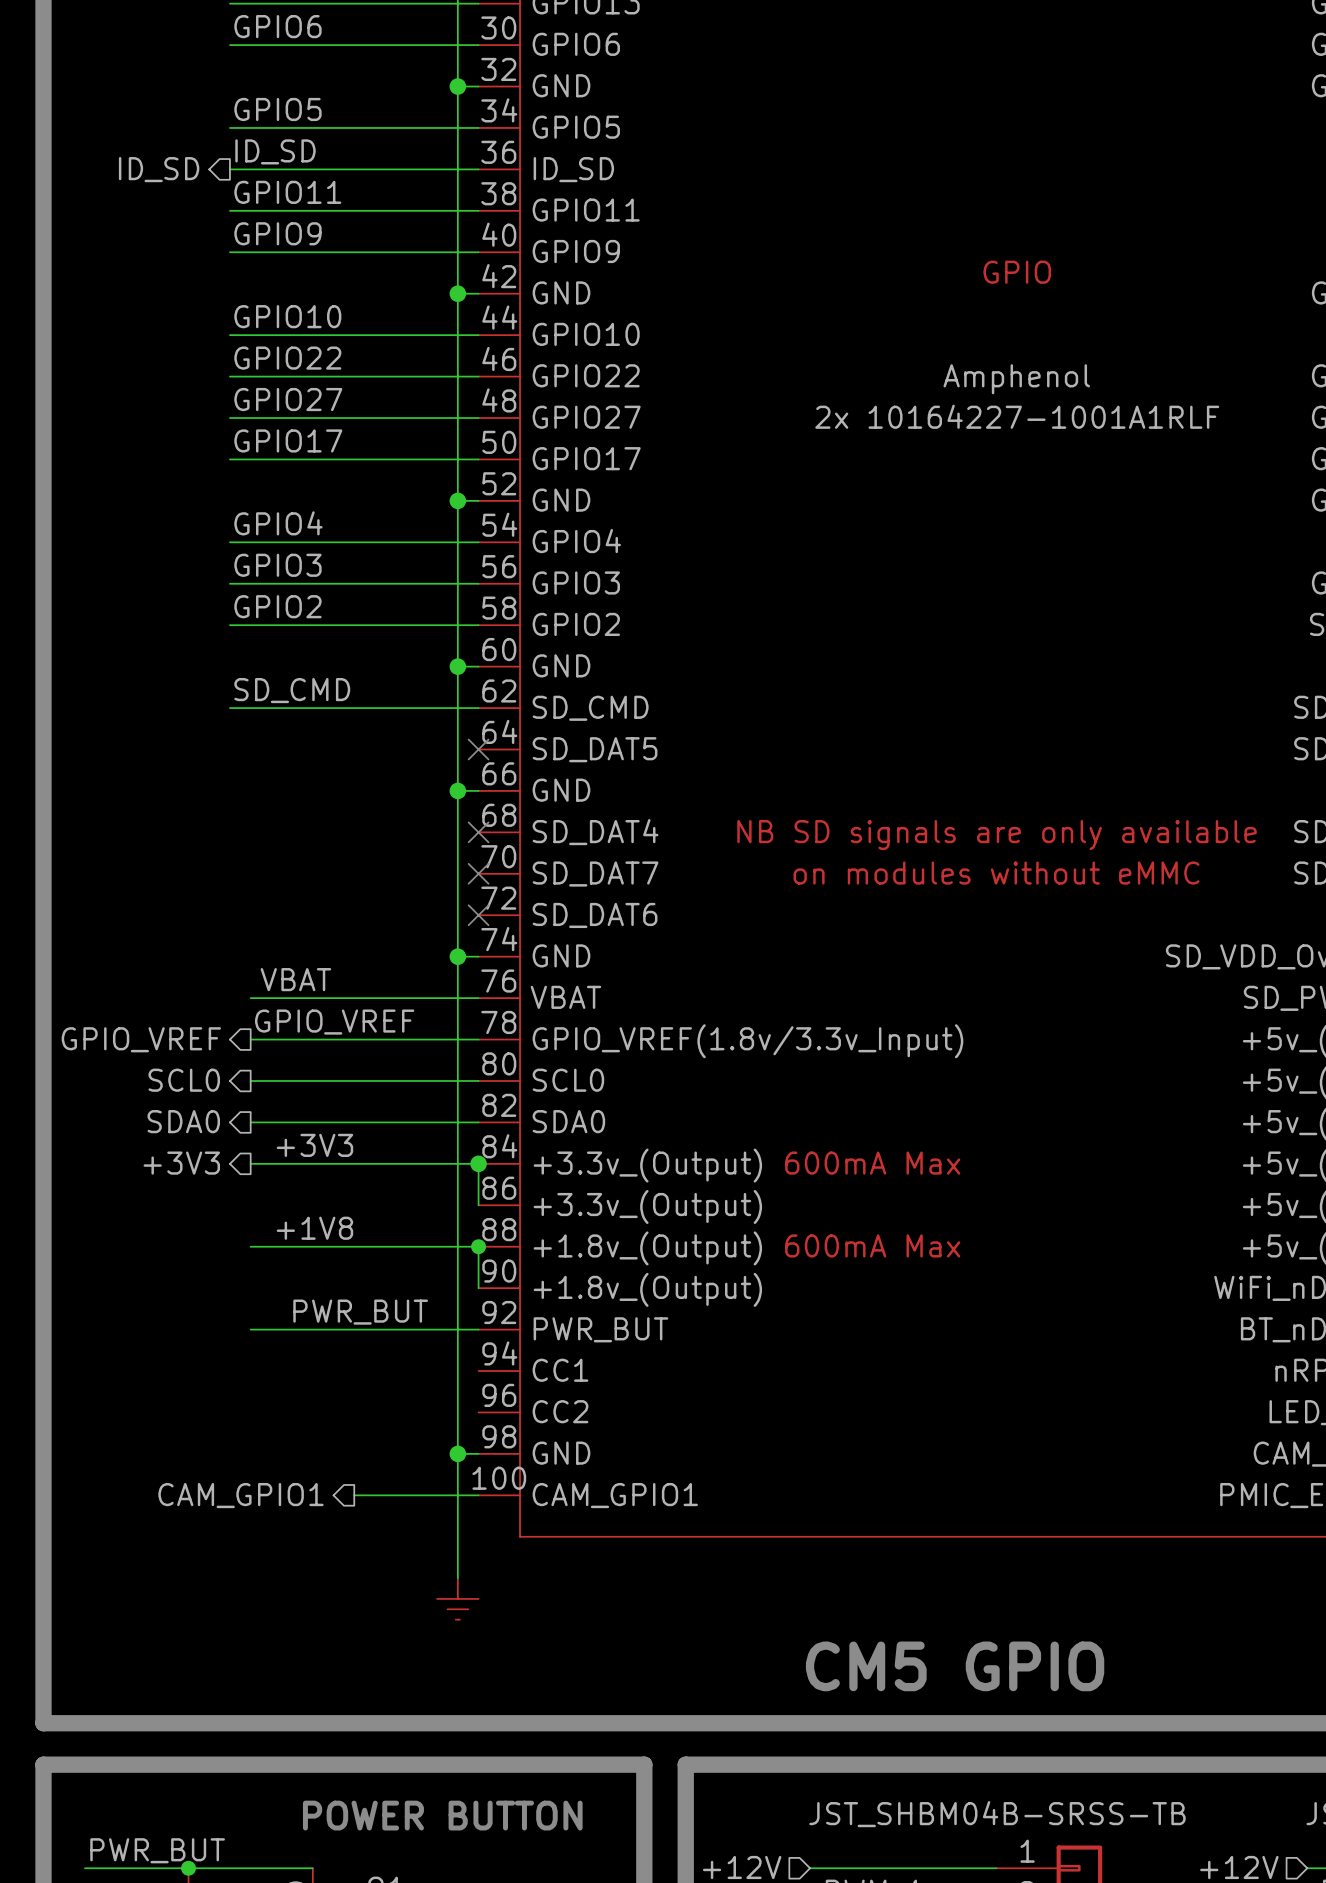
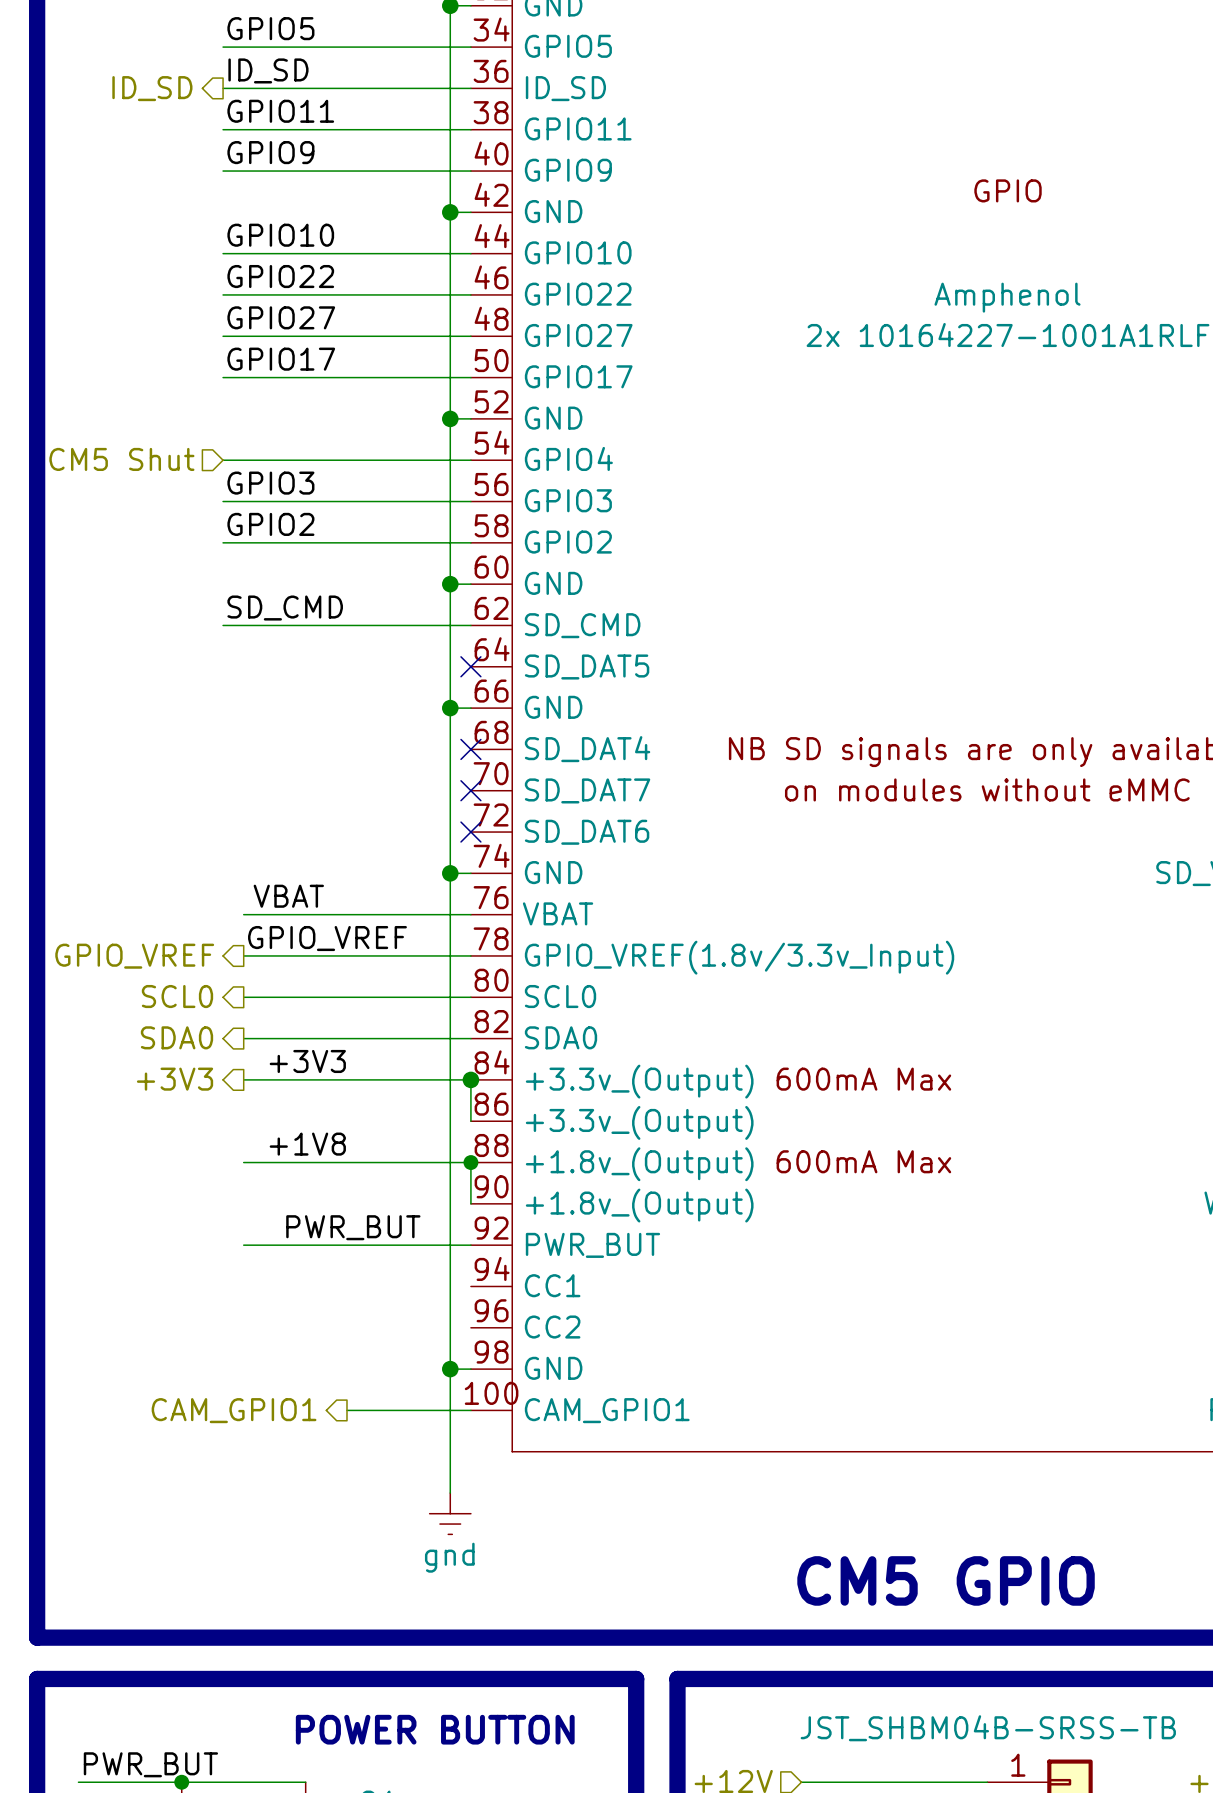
label: GPIO4 (278, 523) -> none
hierarchical label: none -> CM5 Shut (121, 459)
power symbol text: none -> gnd (449, 1557)

